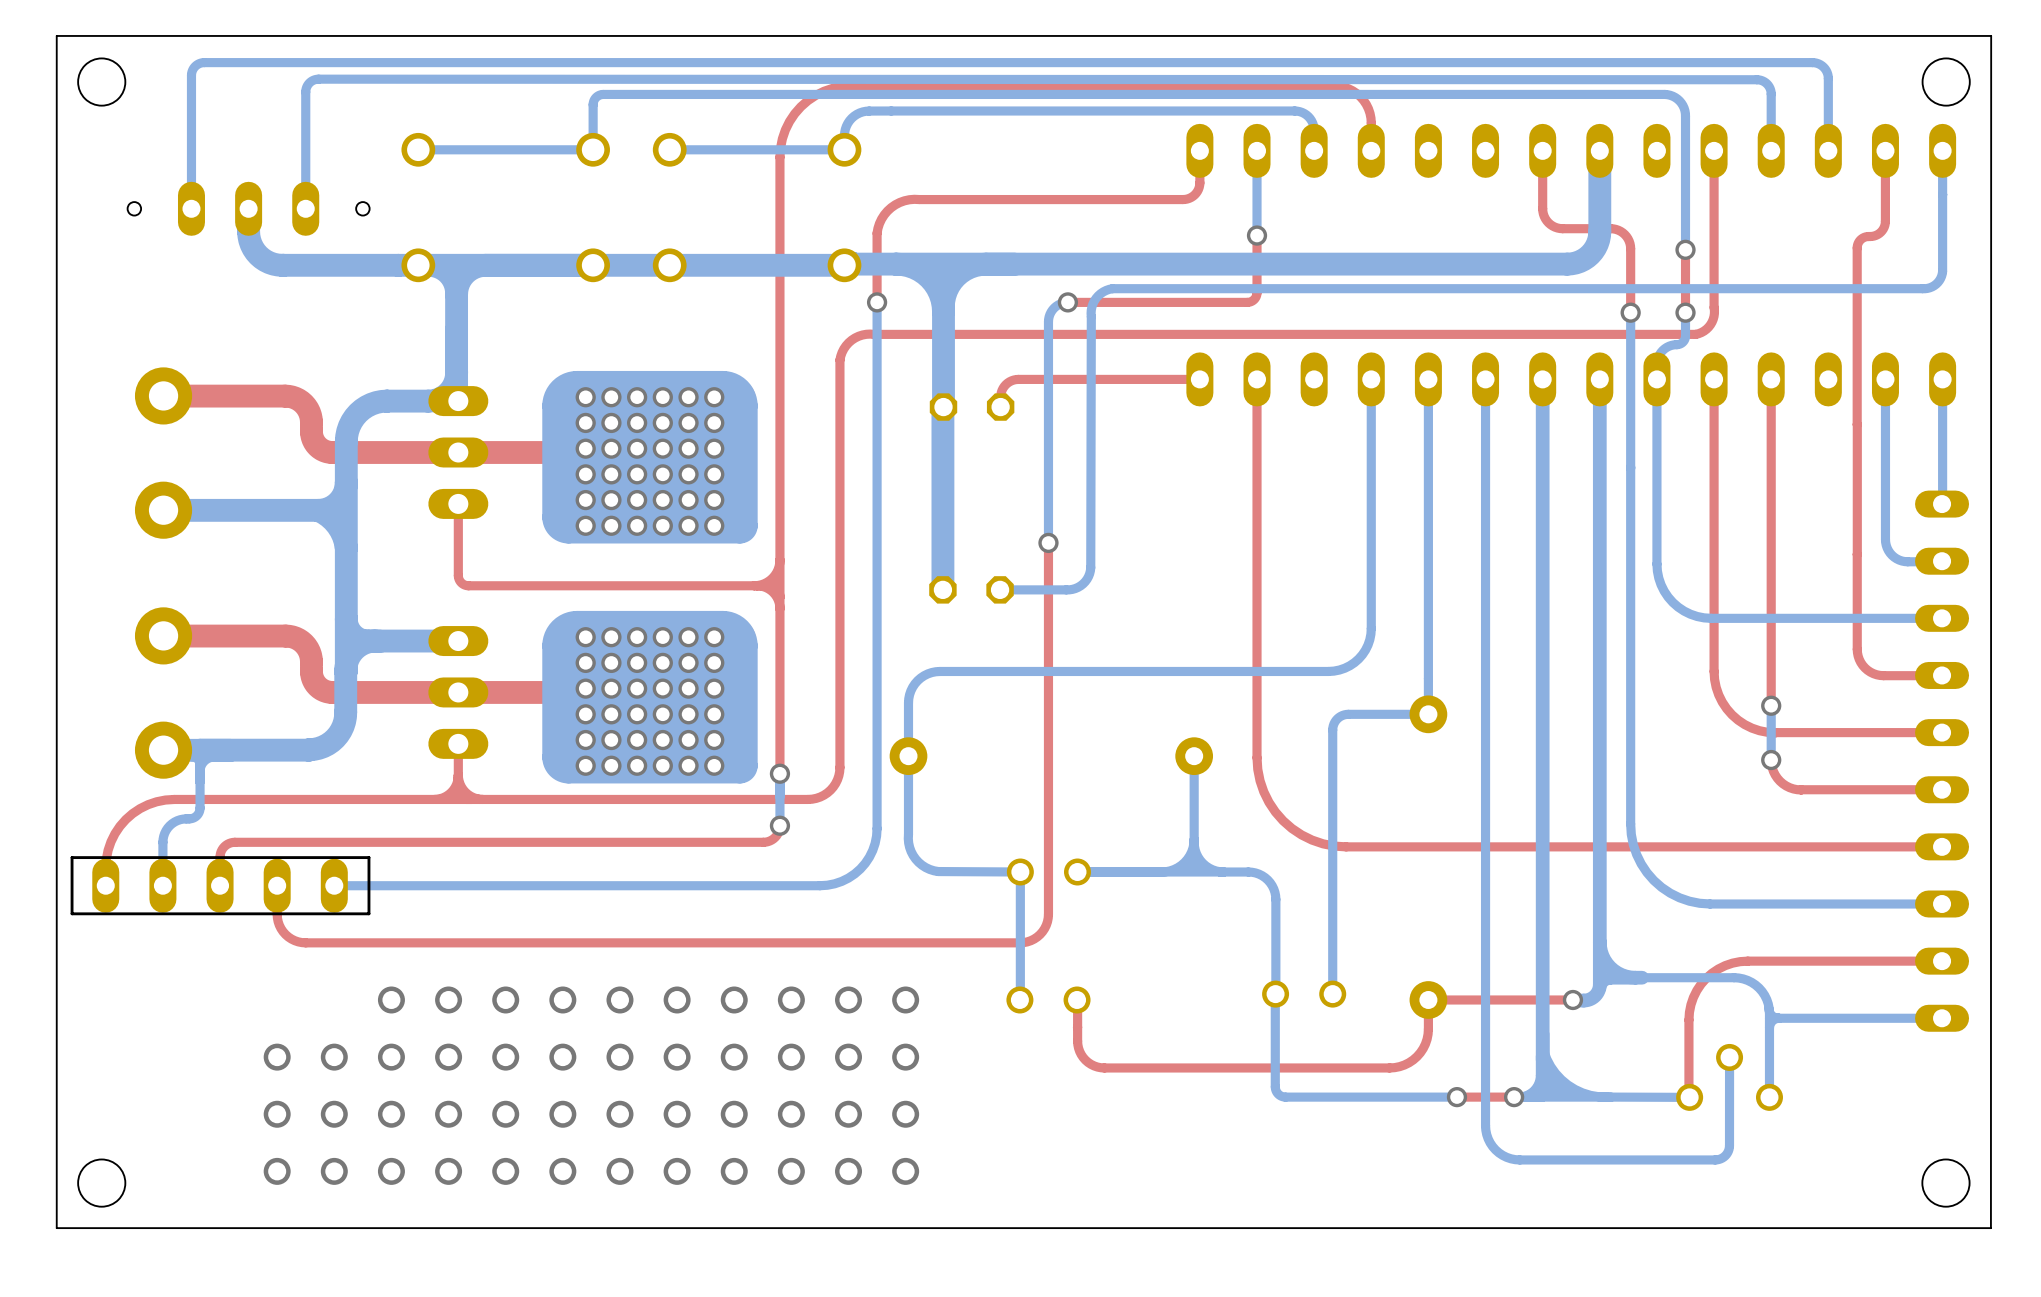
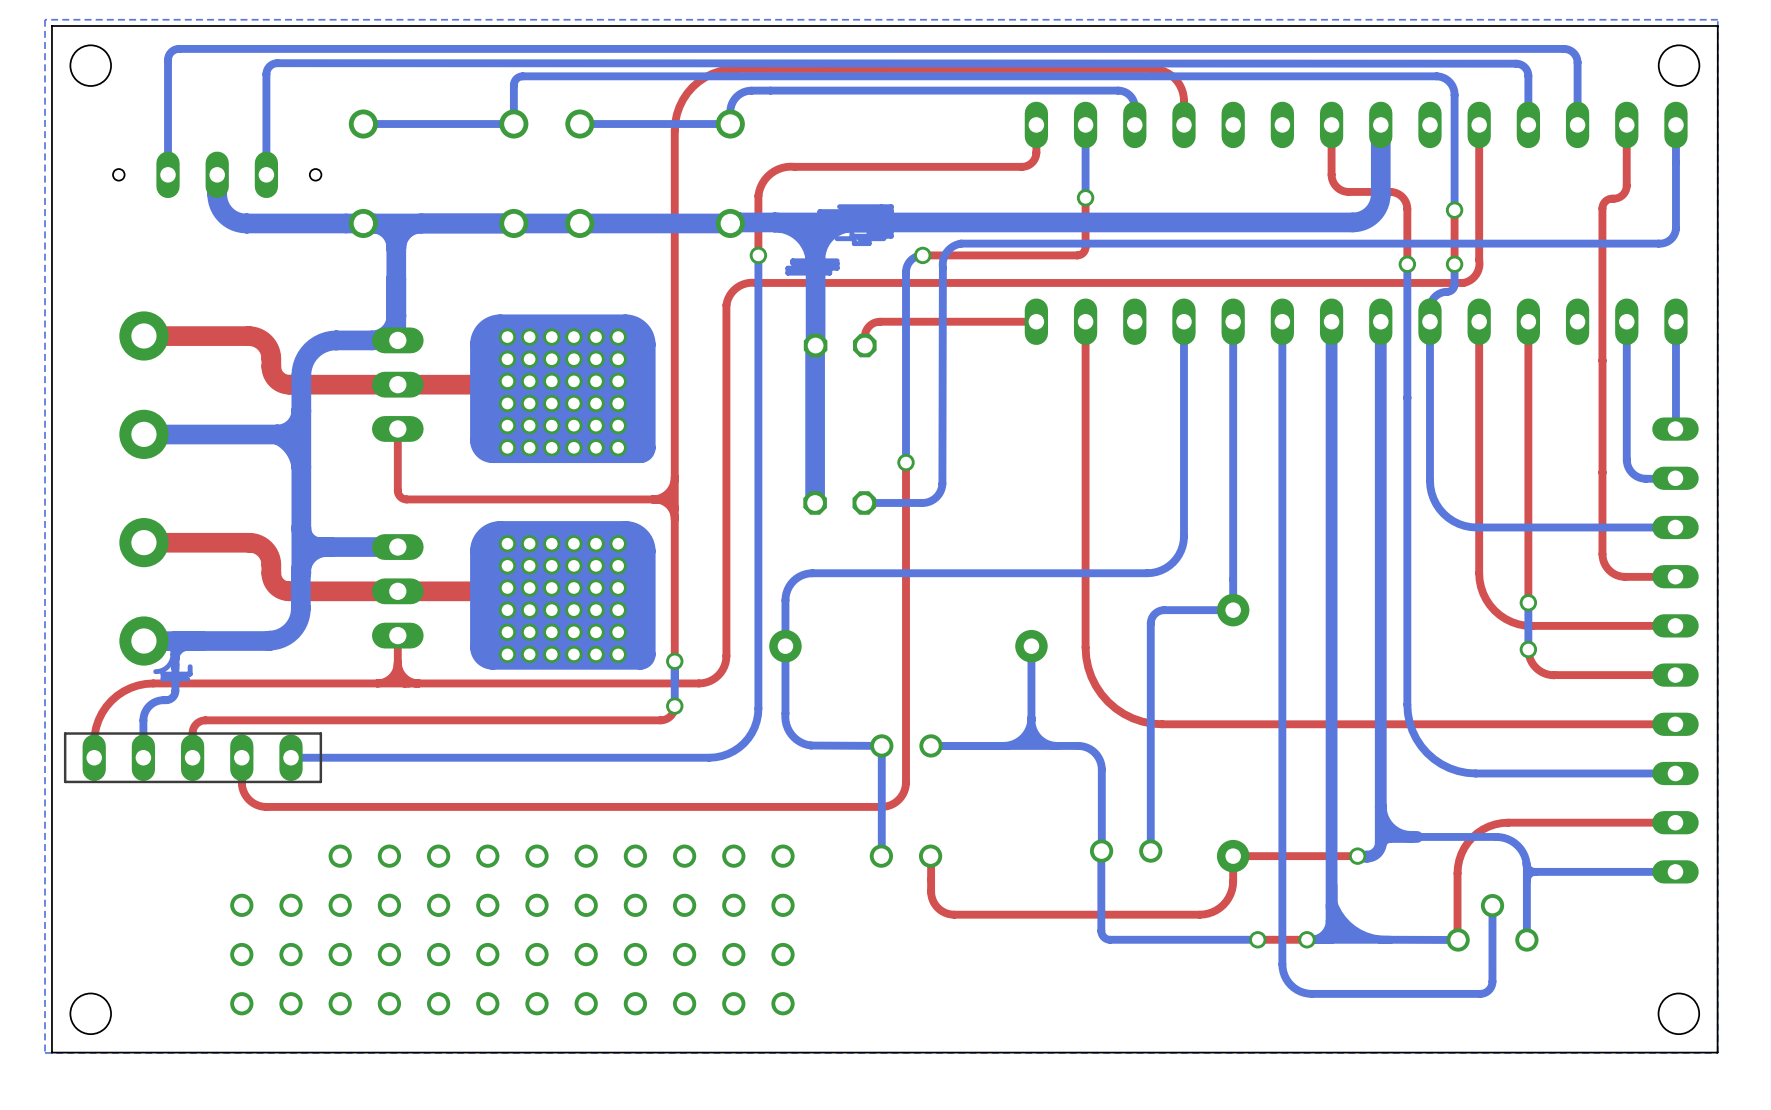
bottom zone outline: none -> (1717, 19) (45, 19) (45, 1052) (1717, 1052) (1717, 19)
bottom track: none -> (839, 206) (891, 206) (891, 231) (869, 231) (869, 243) (854, 243) (854, 236) (891, 236) (891, 233)
bottom track: none -> (881, 206) (881, 214) (819, 214) (819, 211) (891, 211)
bottom track: none -> (851, 233) (851, 238) (837, 238)
bottom track: none -> (807, 236) (807, 270) (829, 270) (829, 273) (787, 273) (787, 268) (837, 268) (837, 263) (792, 263) (792, 260) (837, 260)
bottom track: none -> (883, 238) (859, 238)
bottom track: none -> (172, 649) (172, 658) (169, 664) (162, 670) (155, 671)
bottom track: none -> (190, 666) (190, 674) (163, 674) (163, 679) (187, 679)

